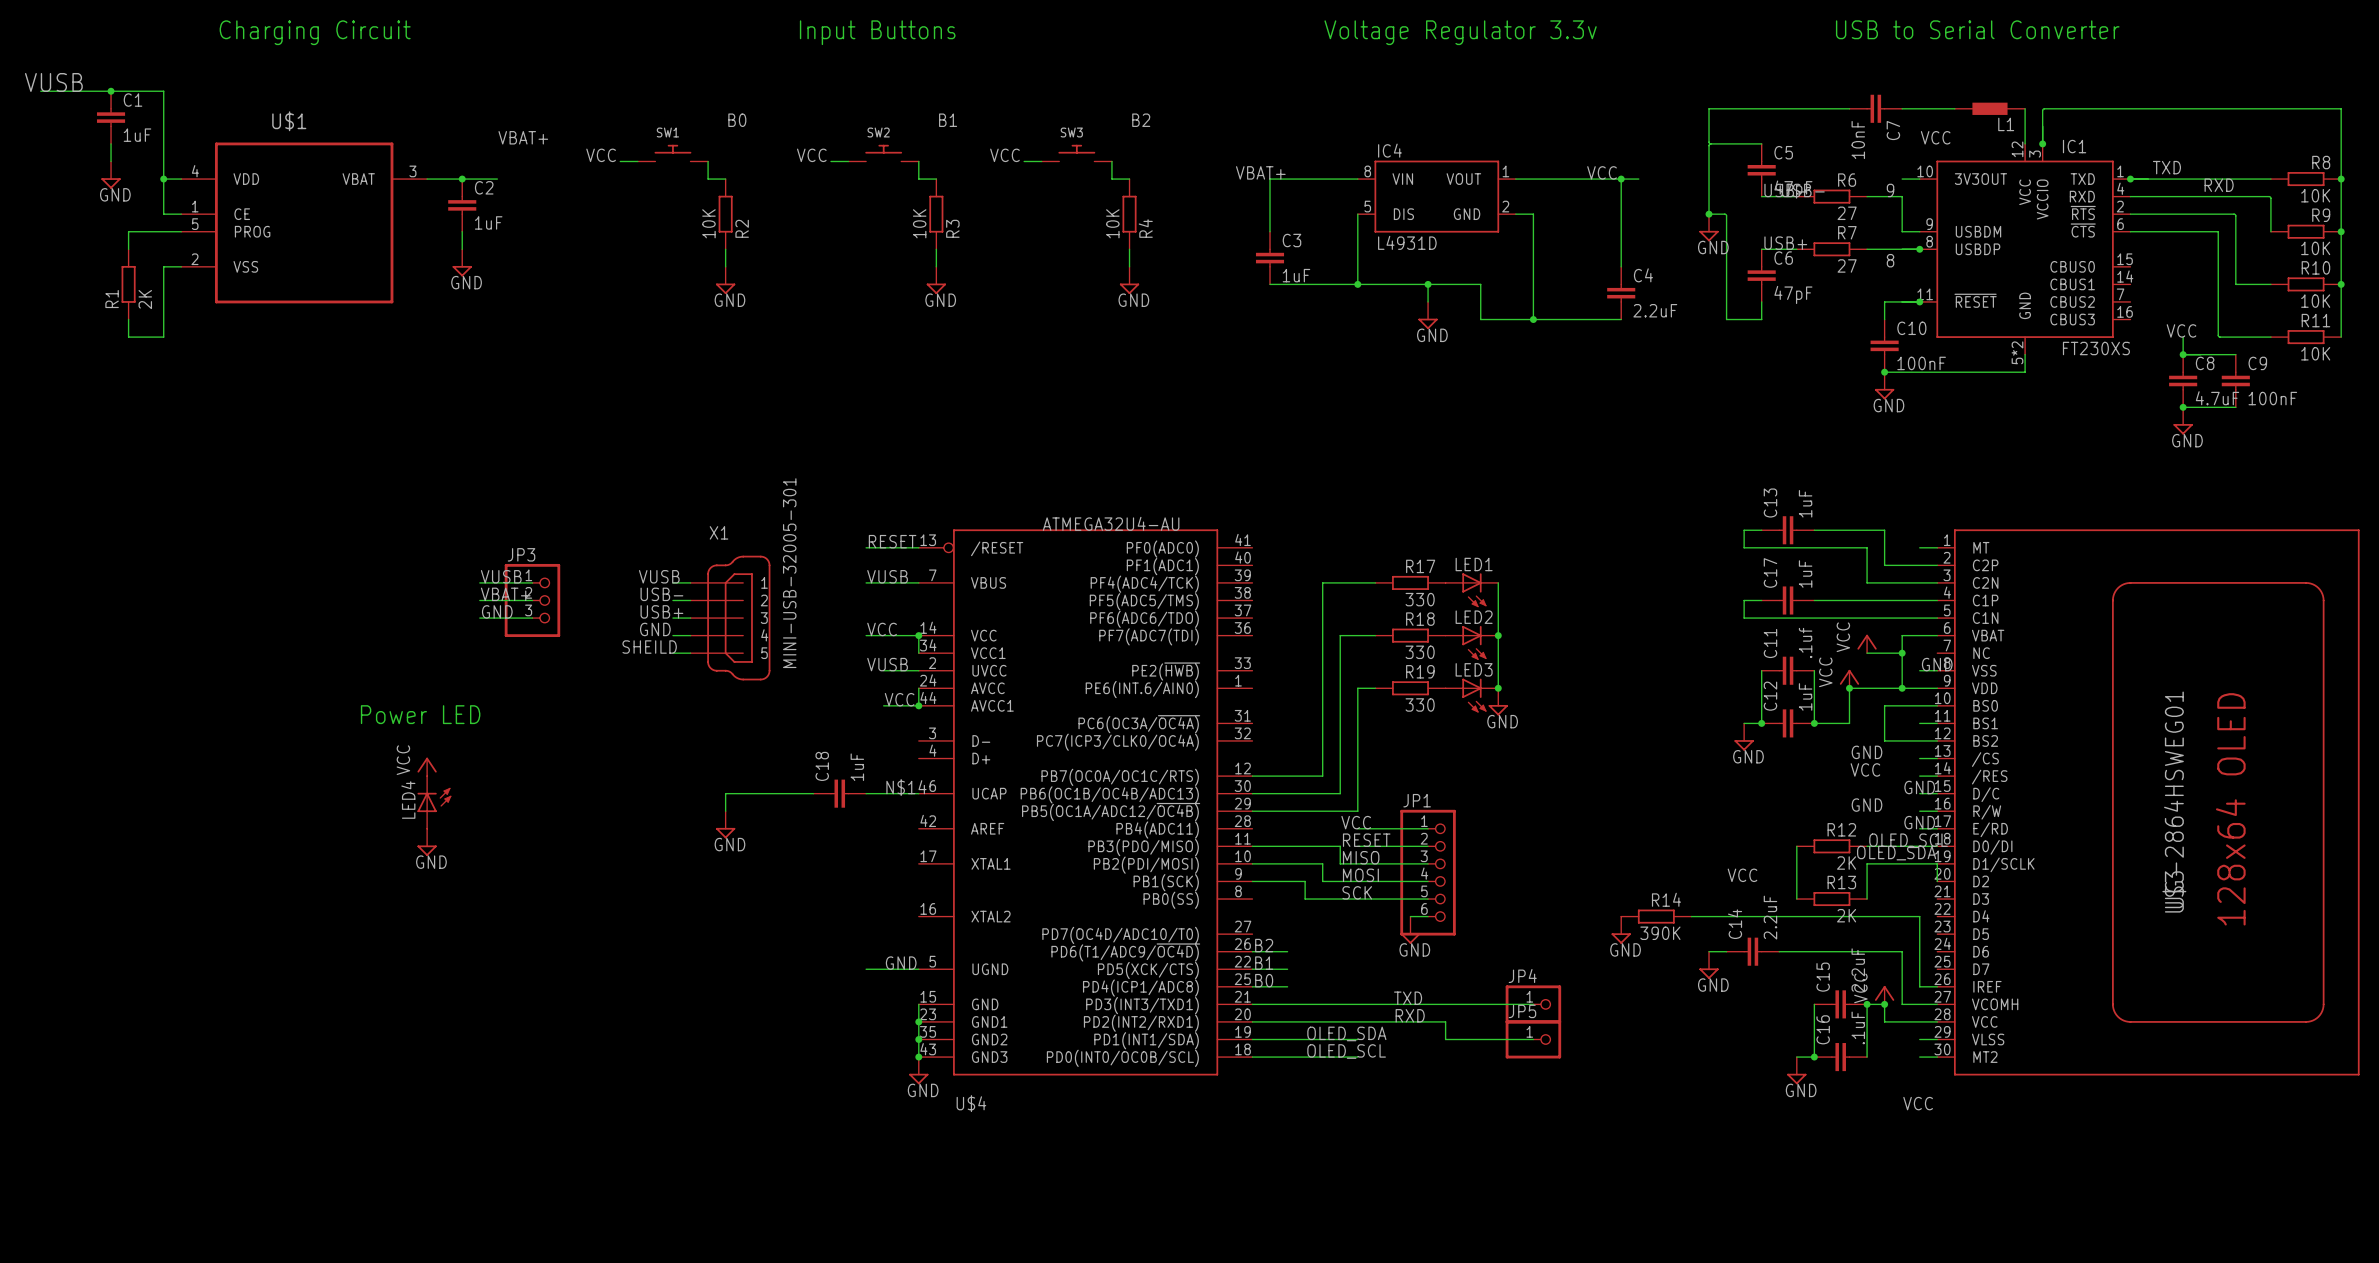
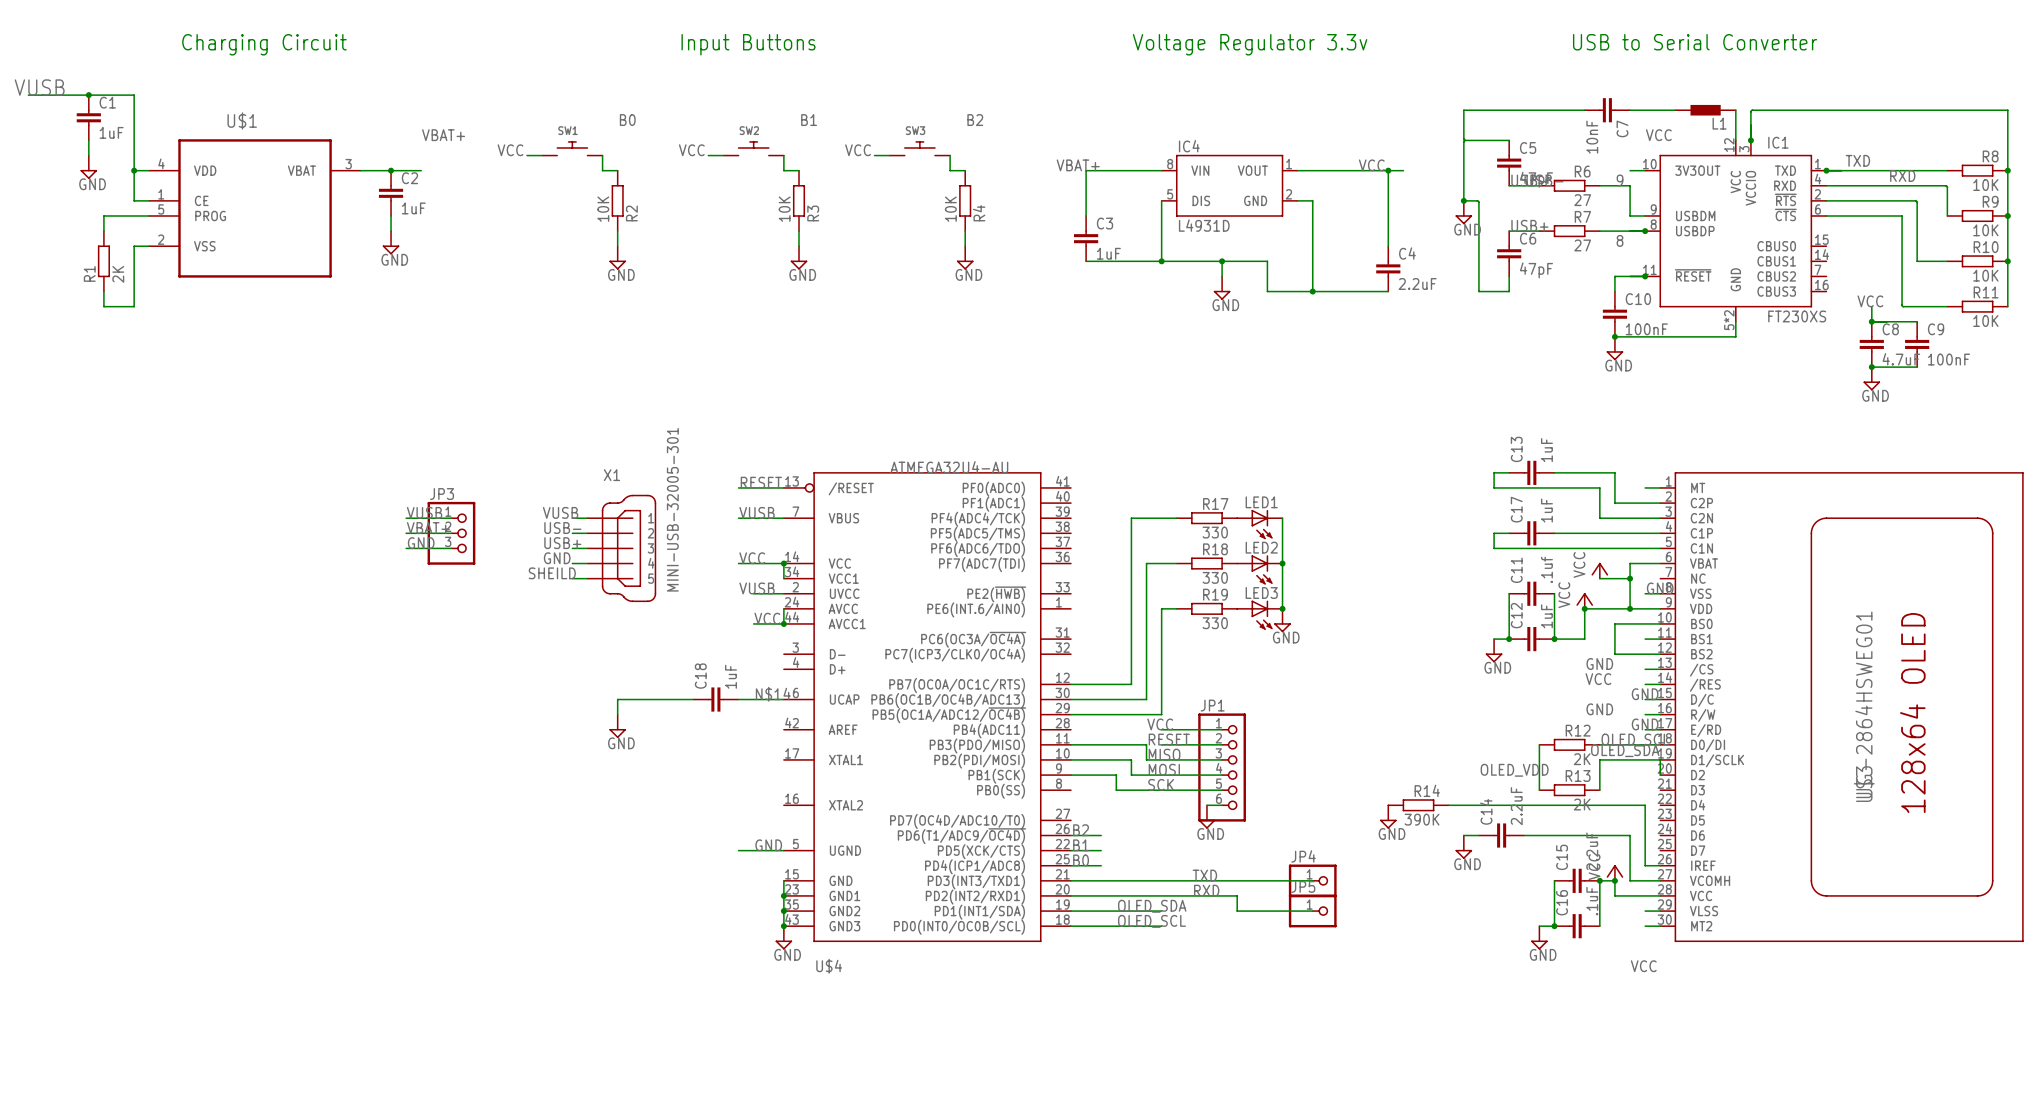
text: Power LED (420, 714) -> none
power symbol: VCC (427, 766) -> none
LED4: (434, 802) -> none
power symbol: GND (427, 842) -> none
label: VCC (1742, 875) -> OLED_VDD (1514, 770)

